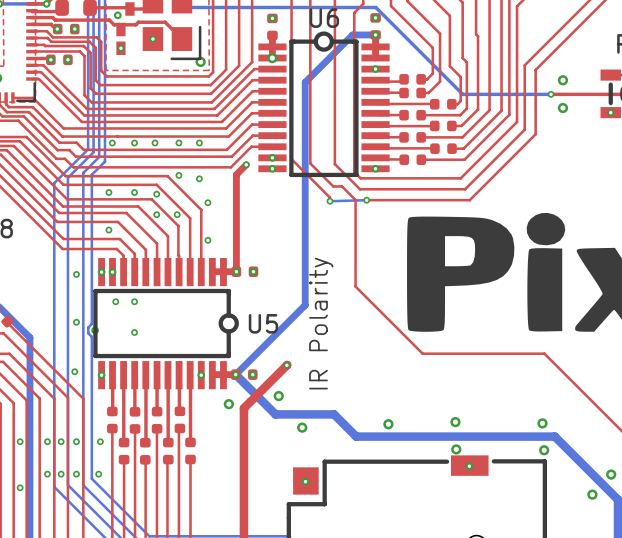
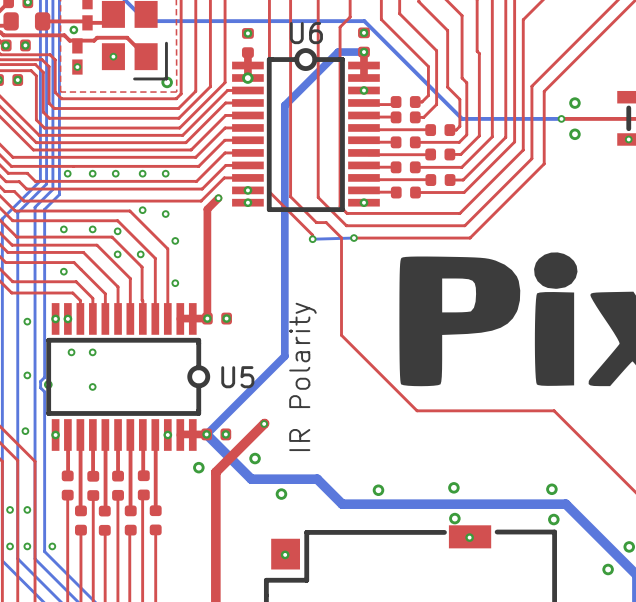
via: (100, 441) -> none

